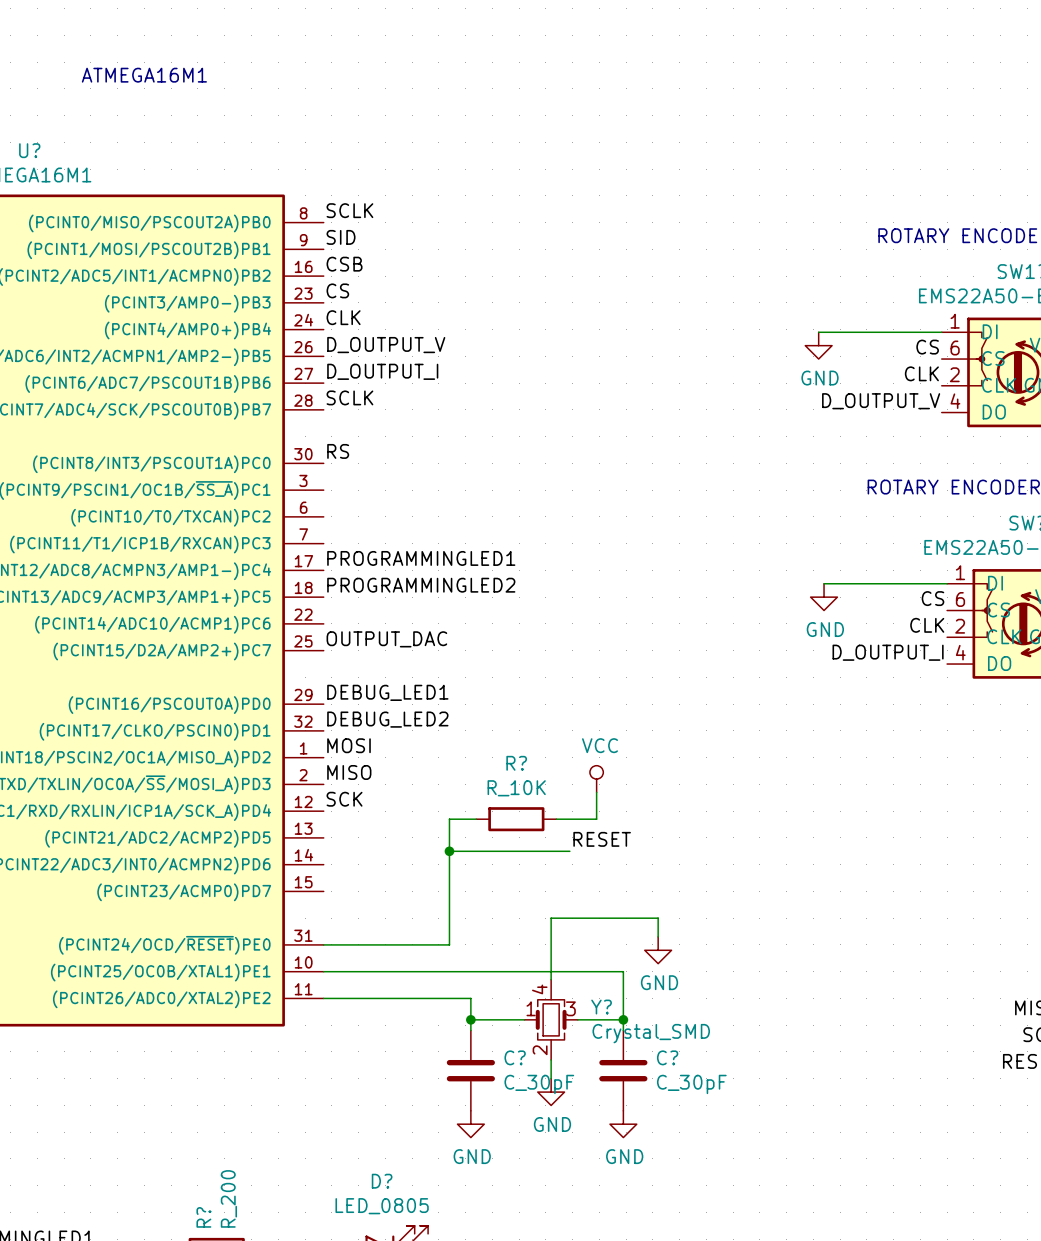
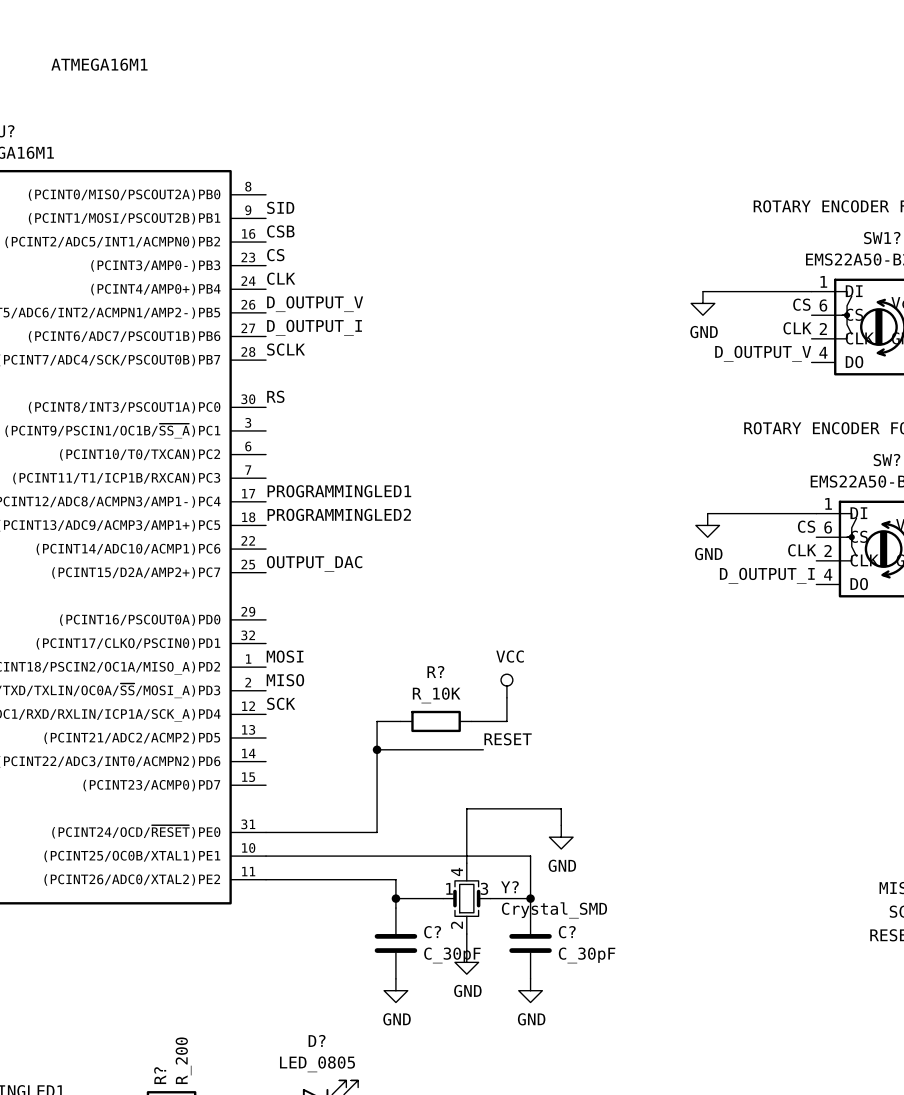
label: SCLK (349, 210) -> none
label: DEBUG_LED1 (387, 692) -> none
label: DEBUG_LED2 (387, 719) -> none

